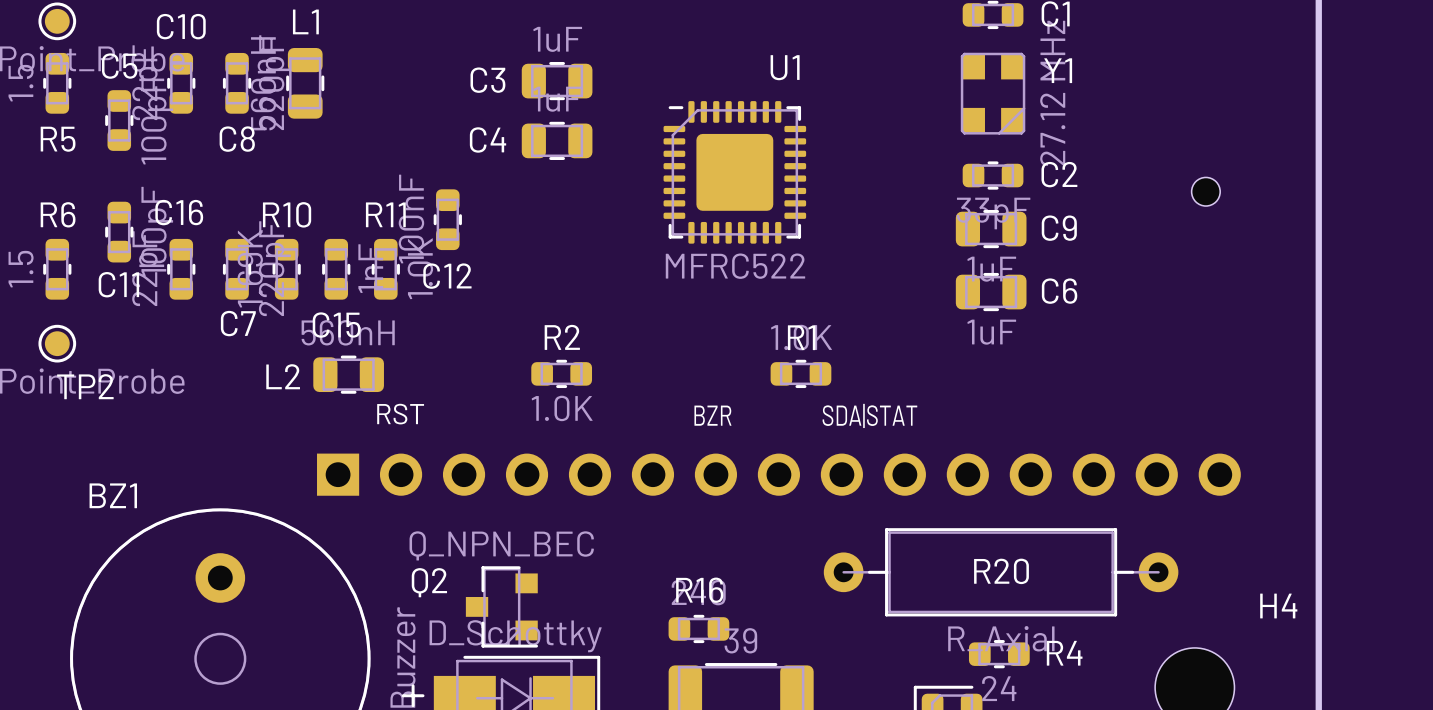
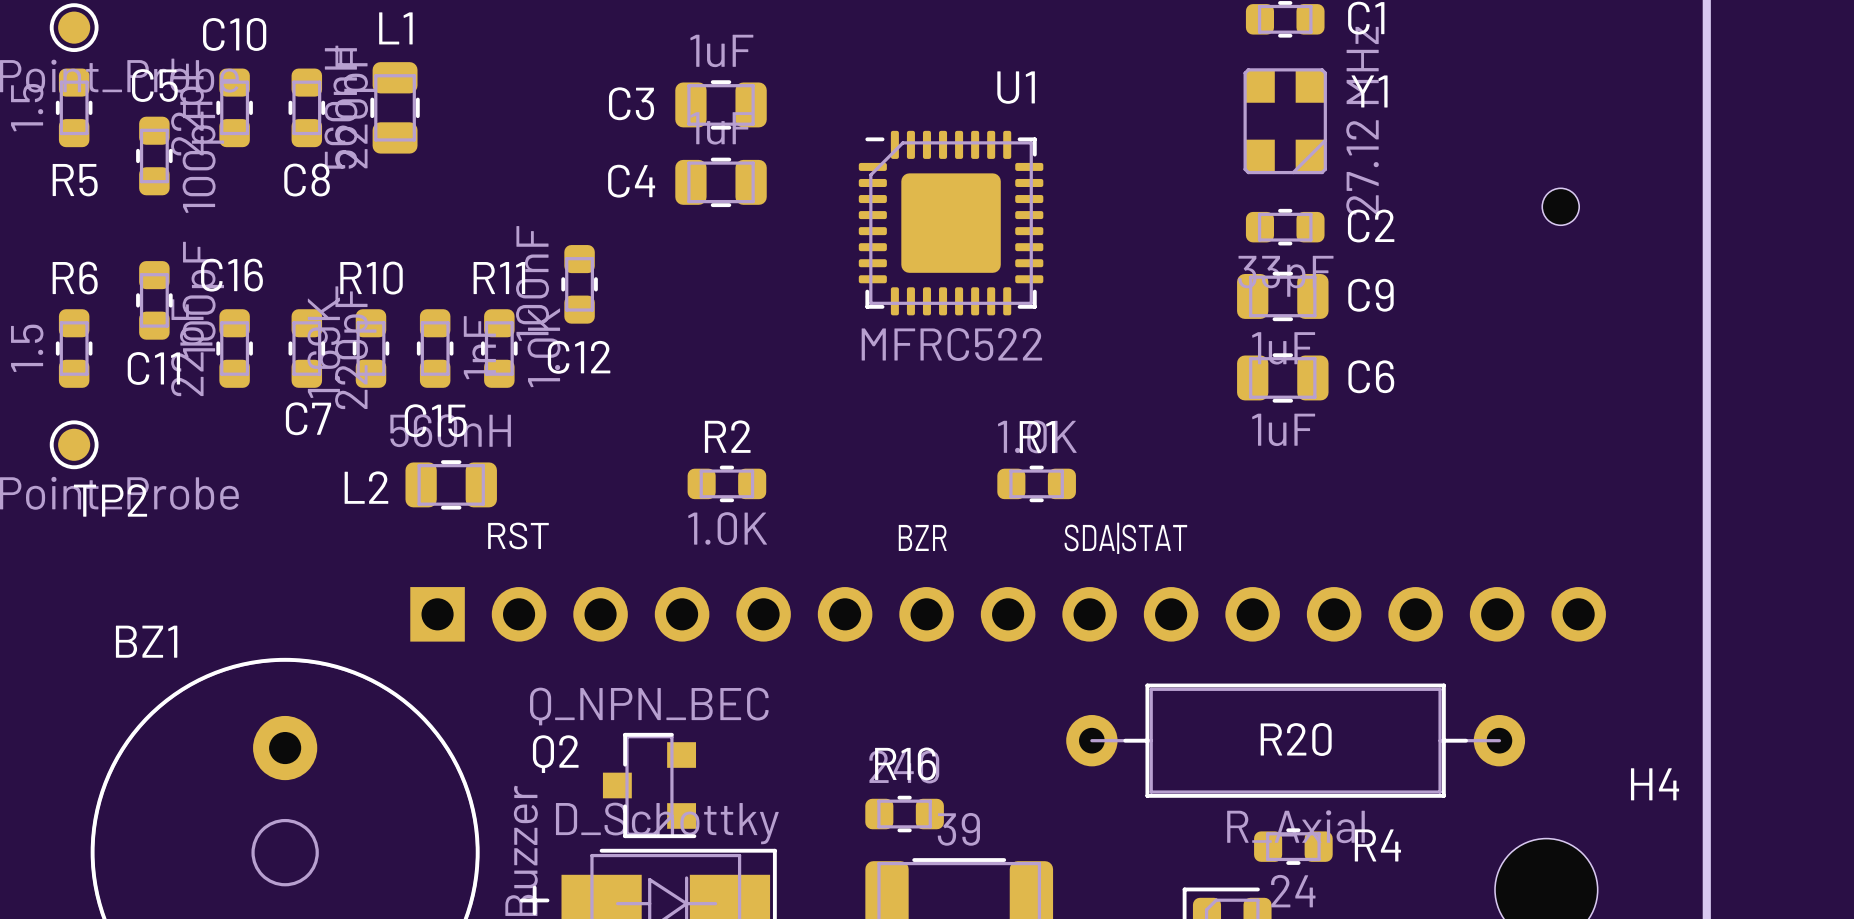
part position: (1205, 191) -> (1560, 206)

